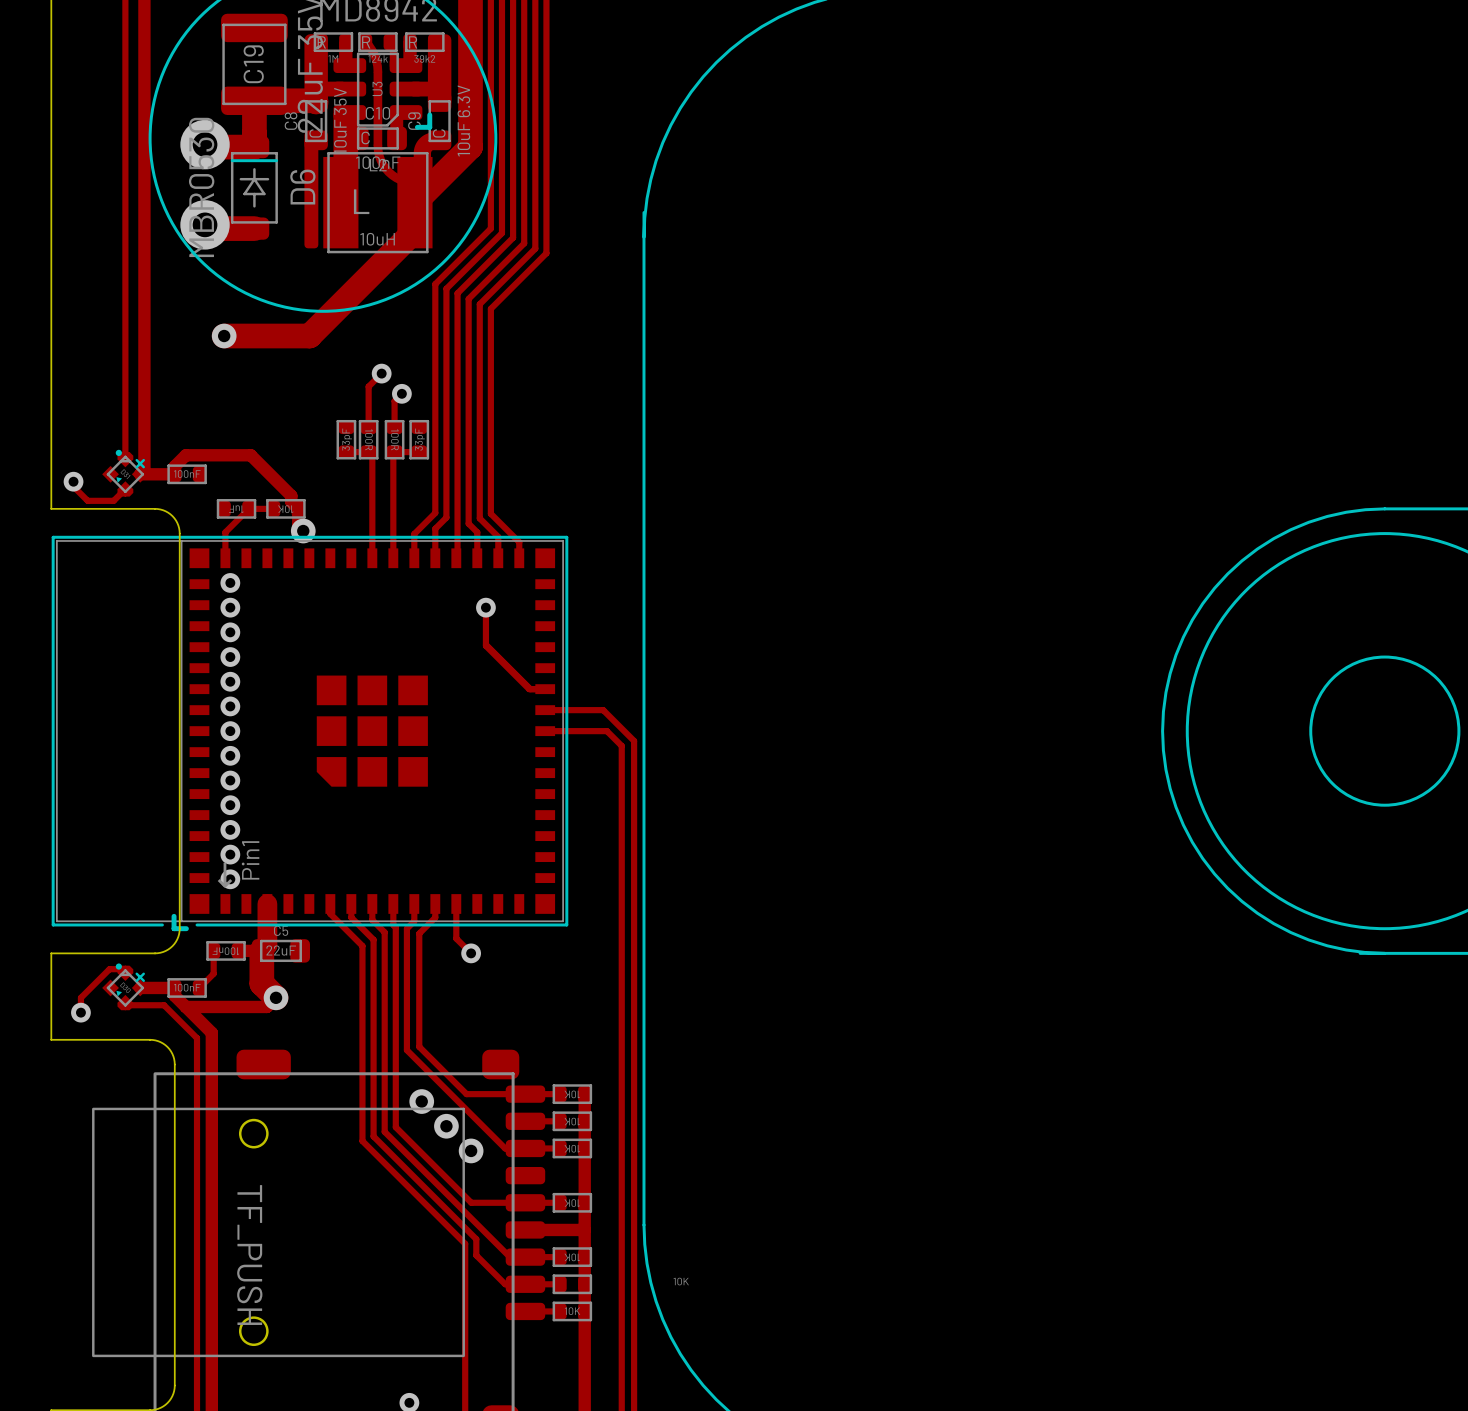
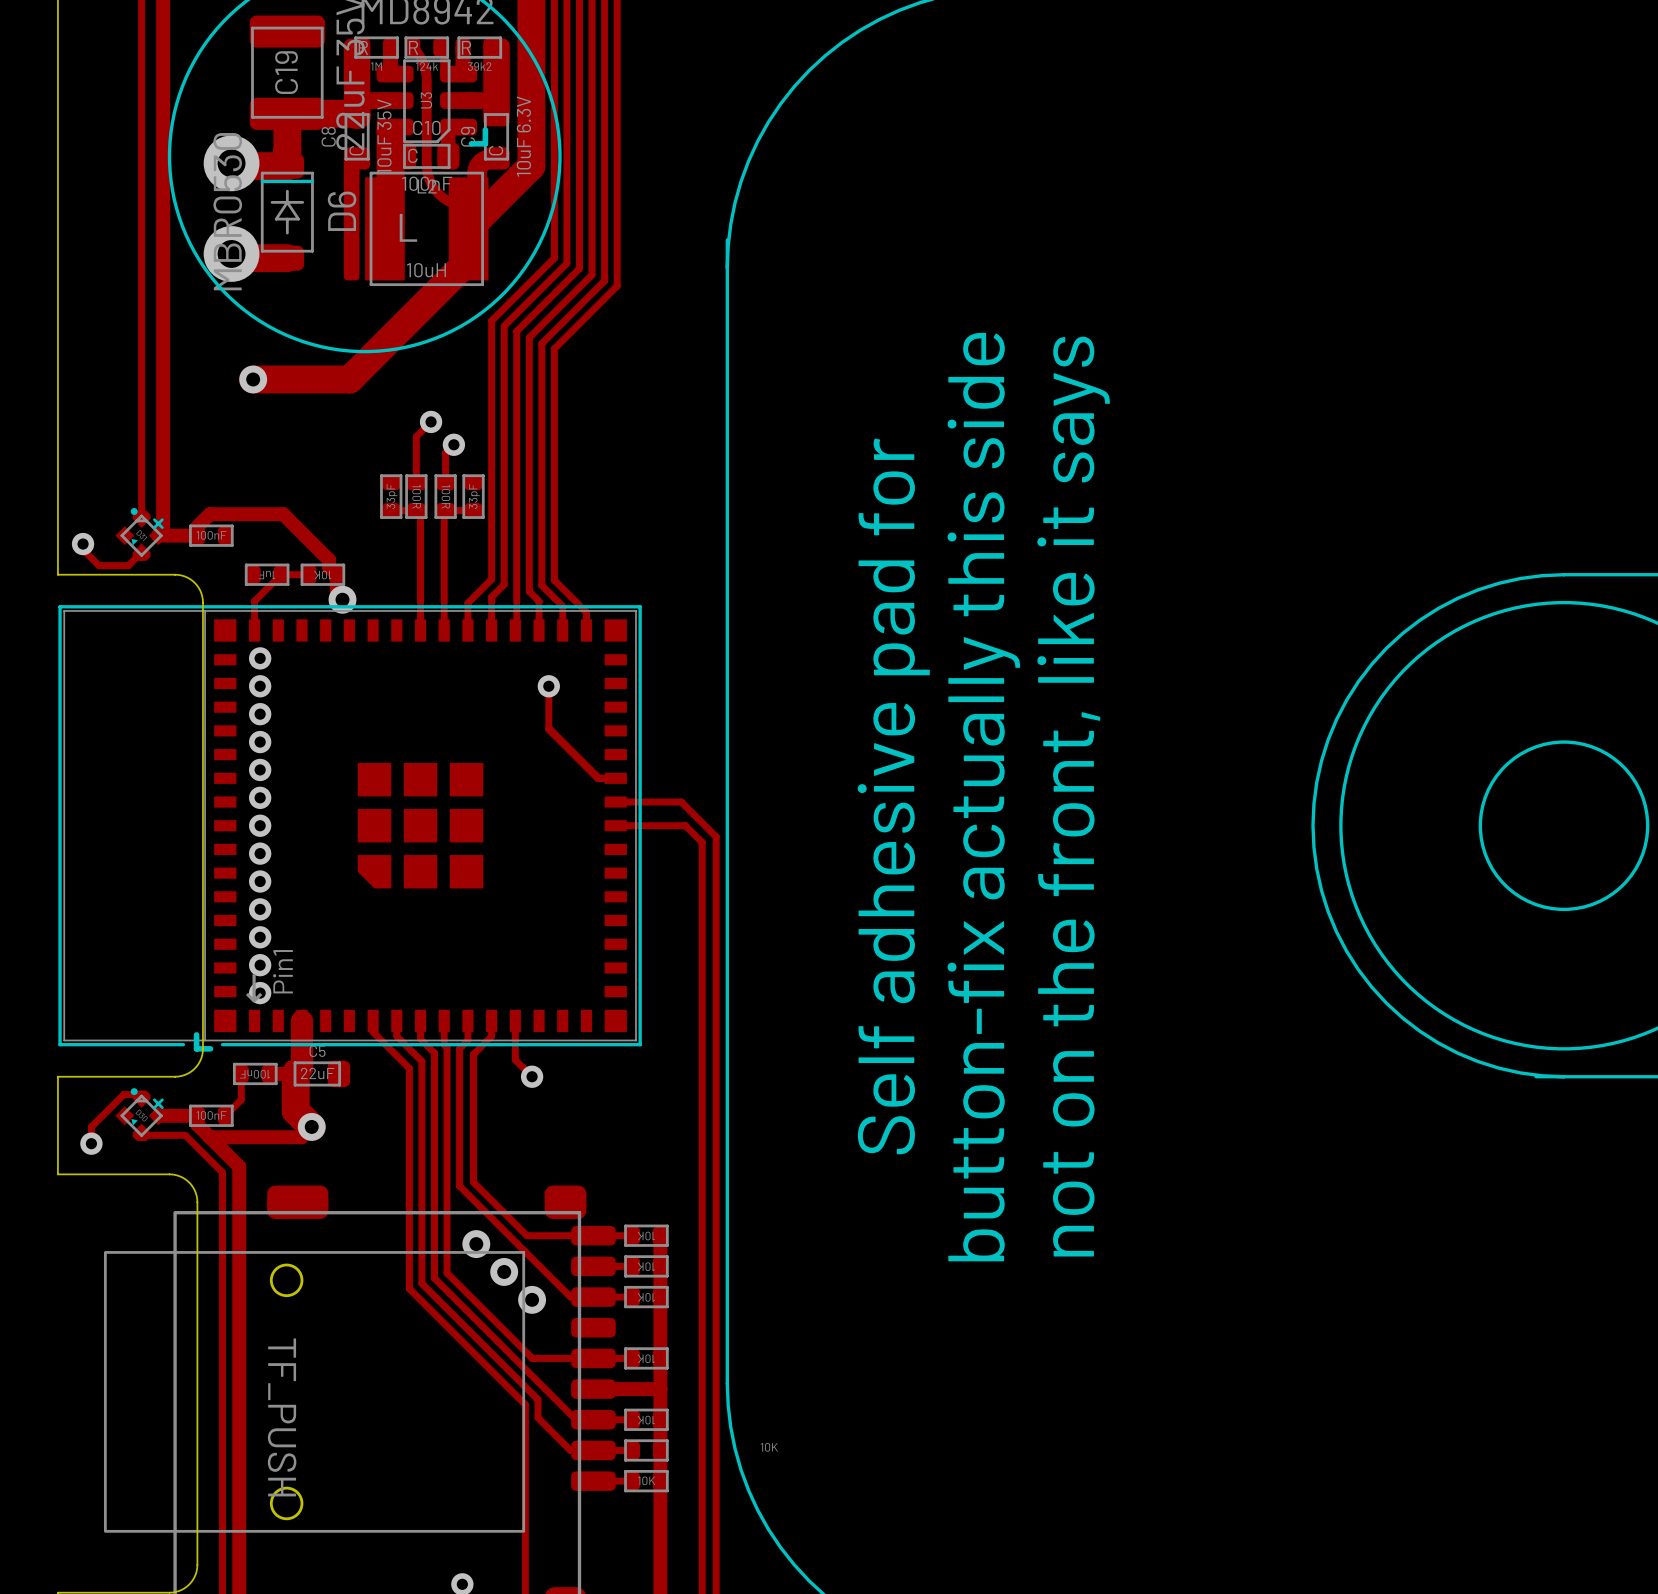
text: none -> Self adhesive pad for (893, 796)
text: none -> button-fix actually this side (983, 797)
text: none -> not on the front, like it says (1073, 796)

